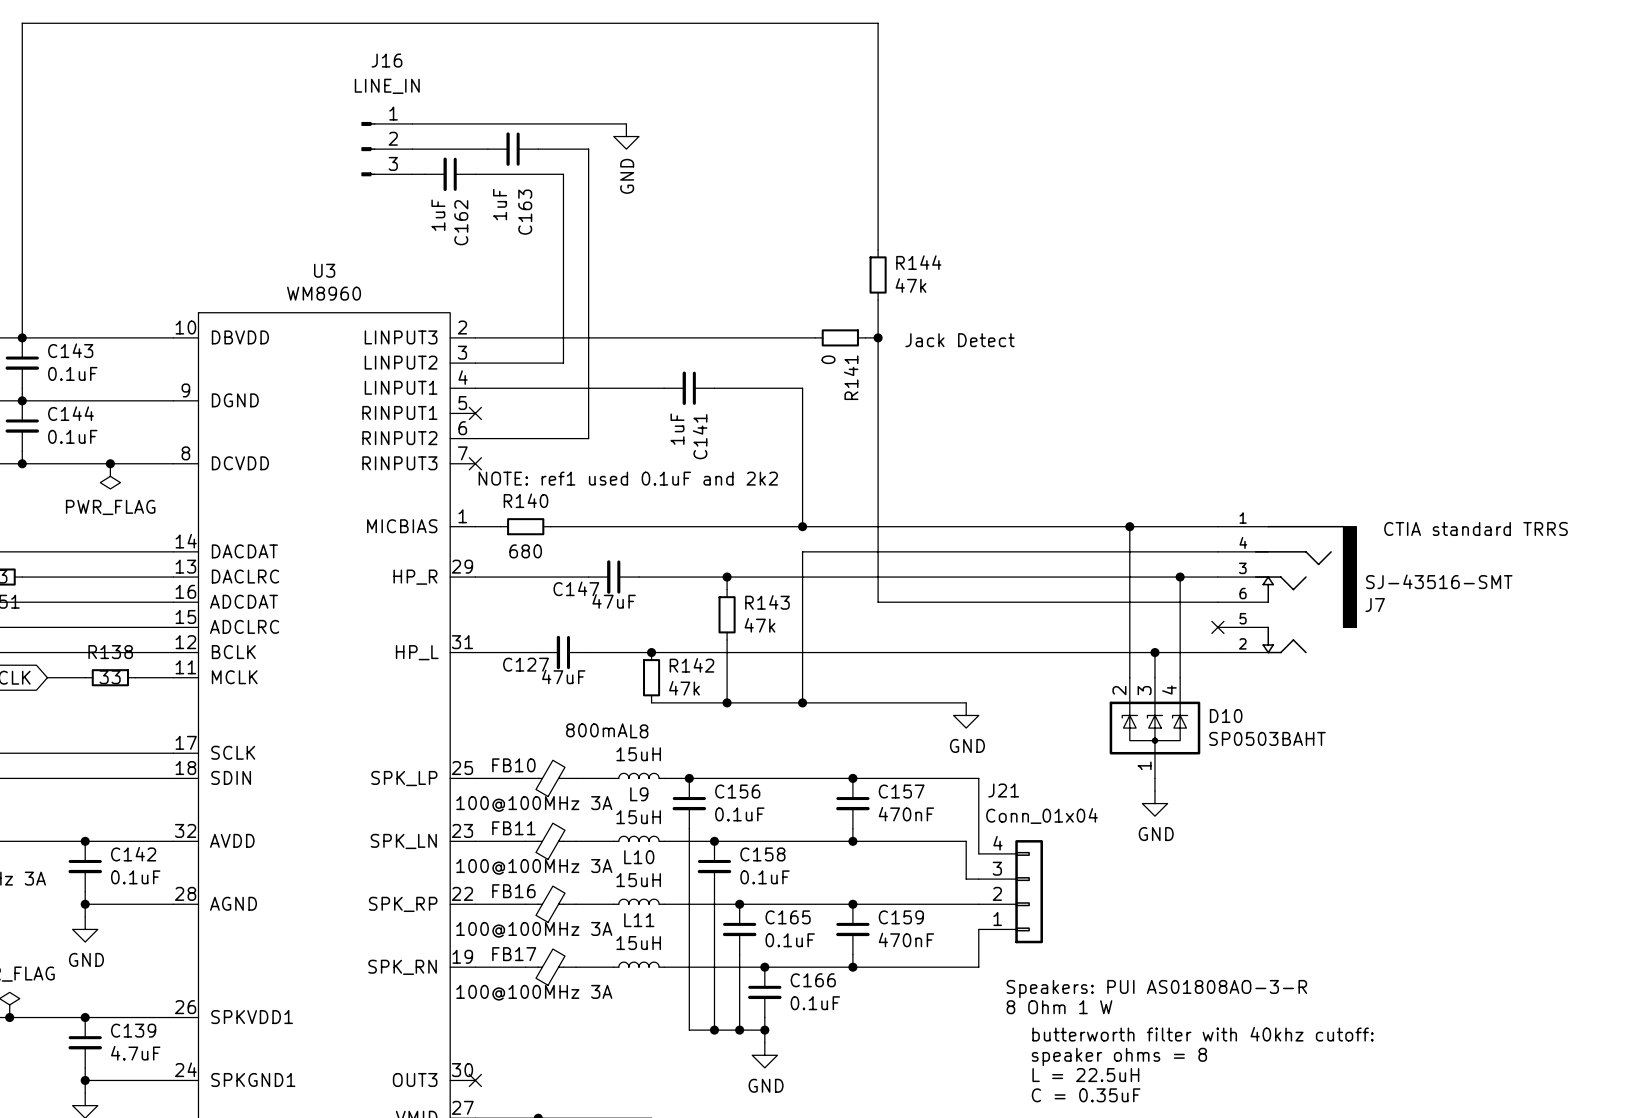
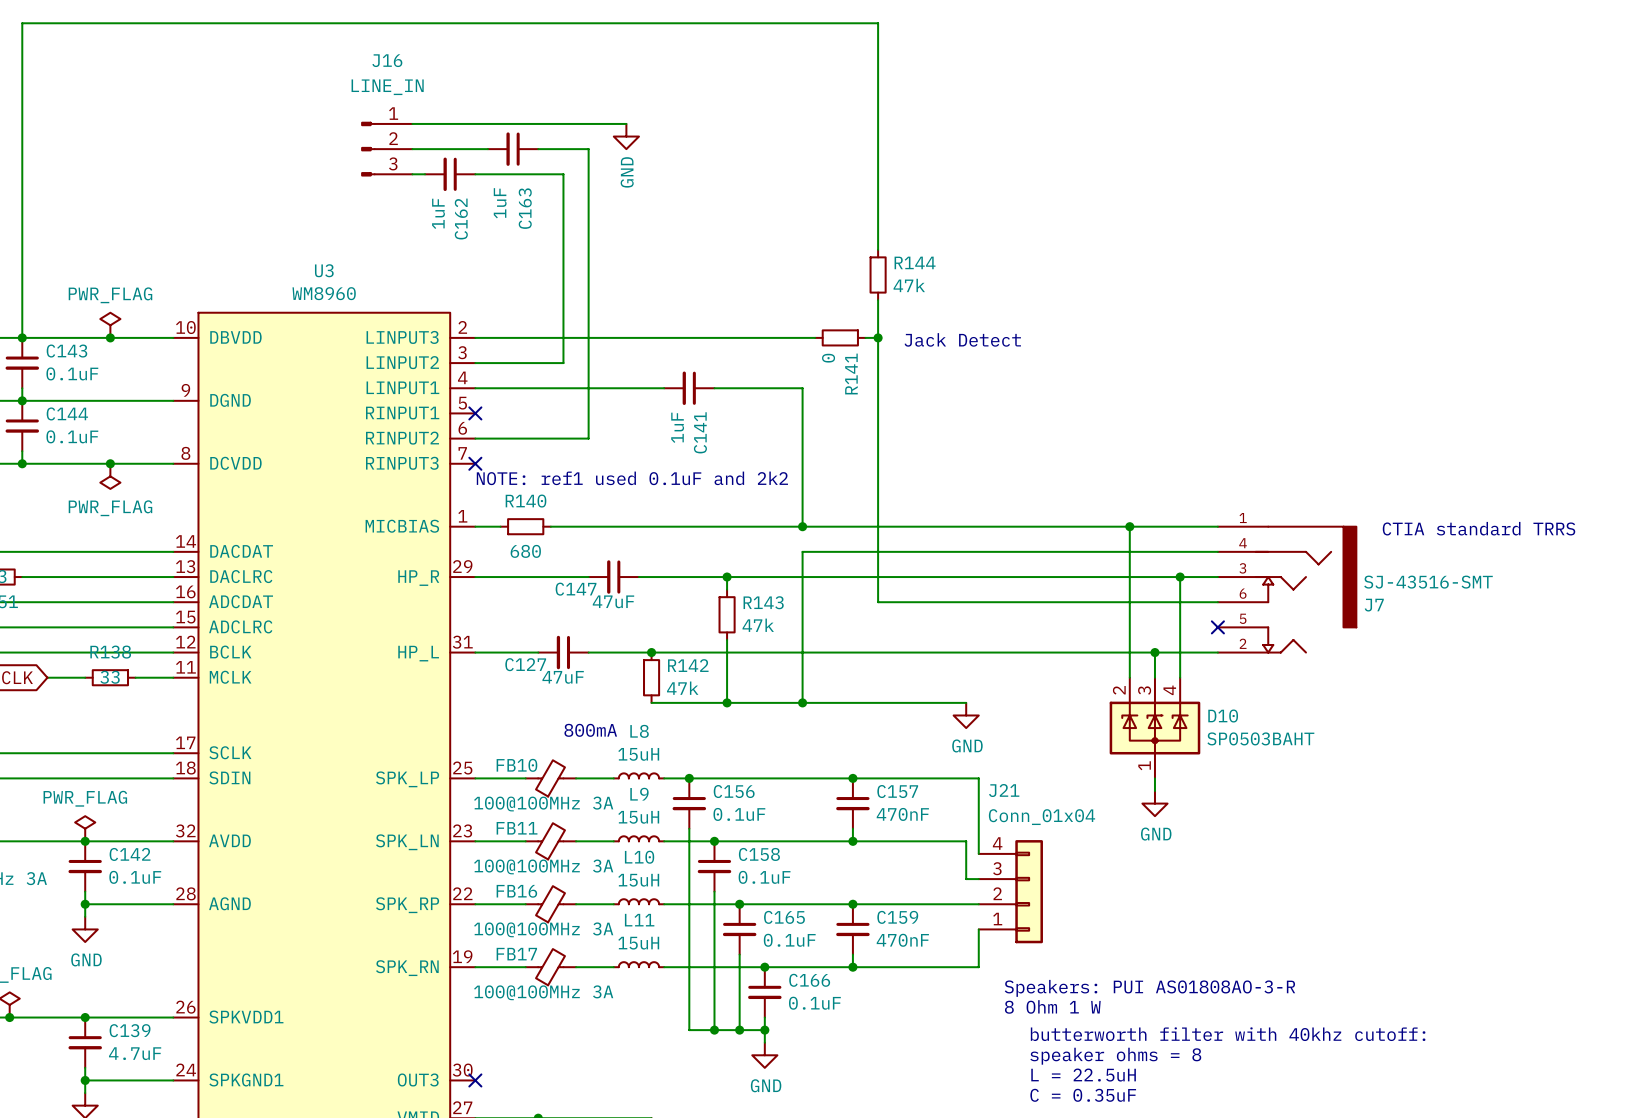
power symbol: none -> PWR_FLAG (110, 325)
junction: none -> (110, 337)
power symbol: none -> PWR_FLAG (85, 828)

